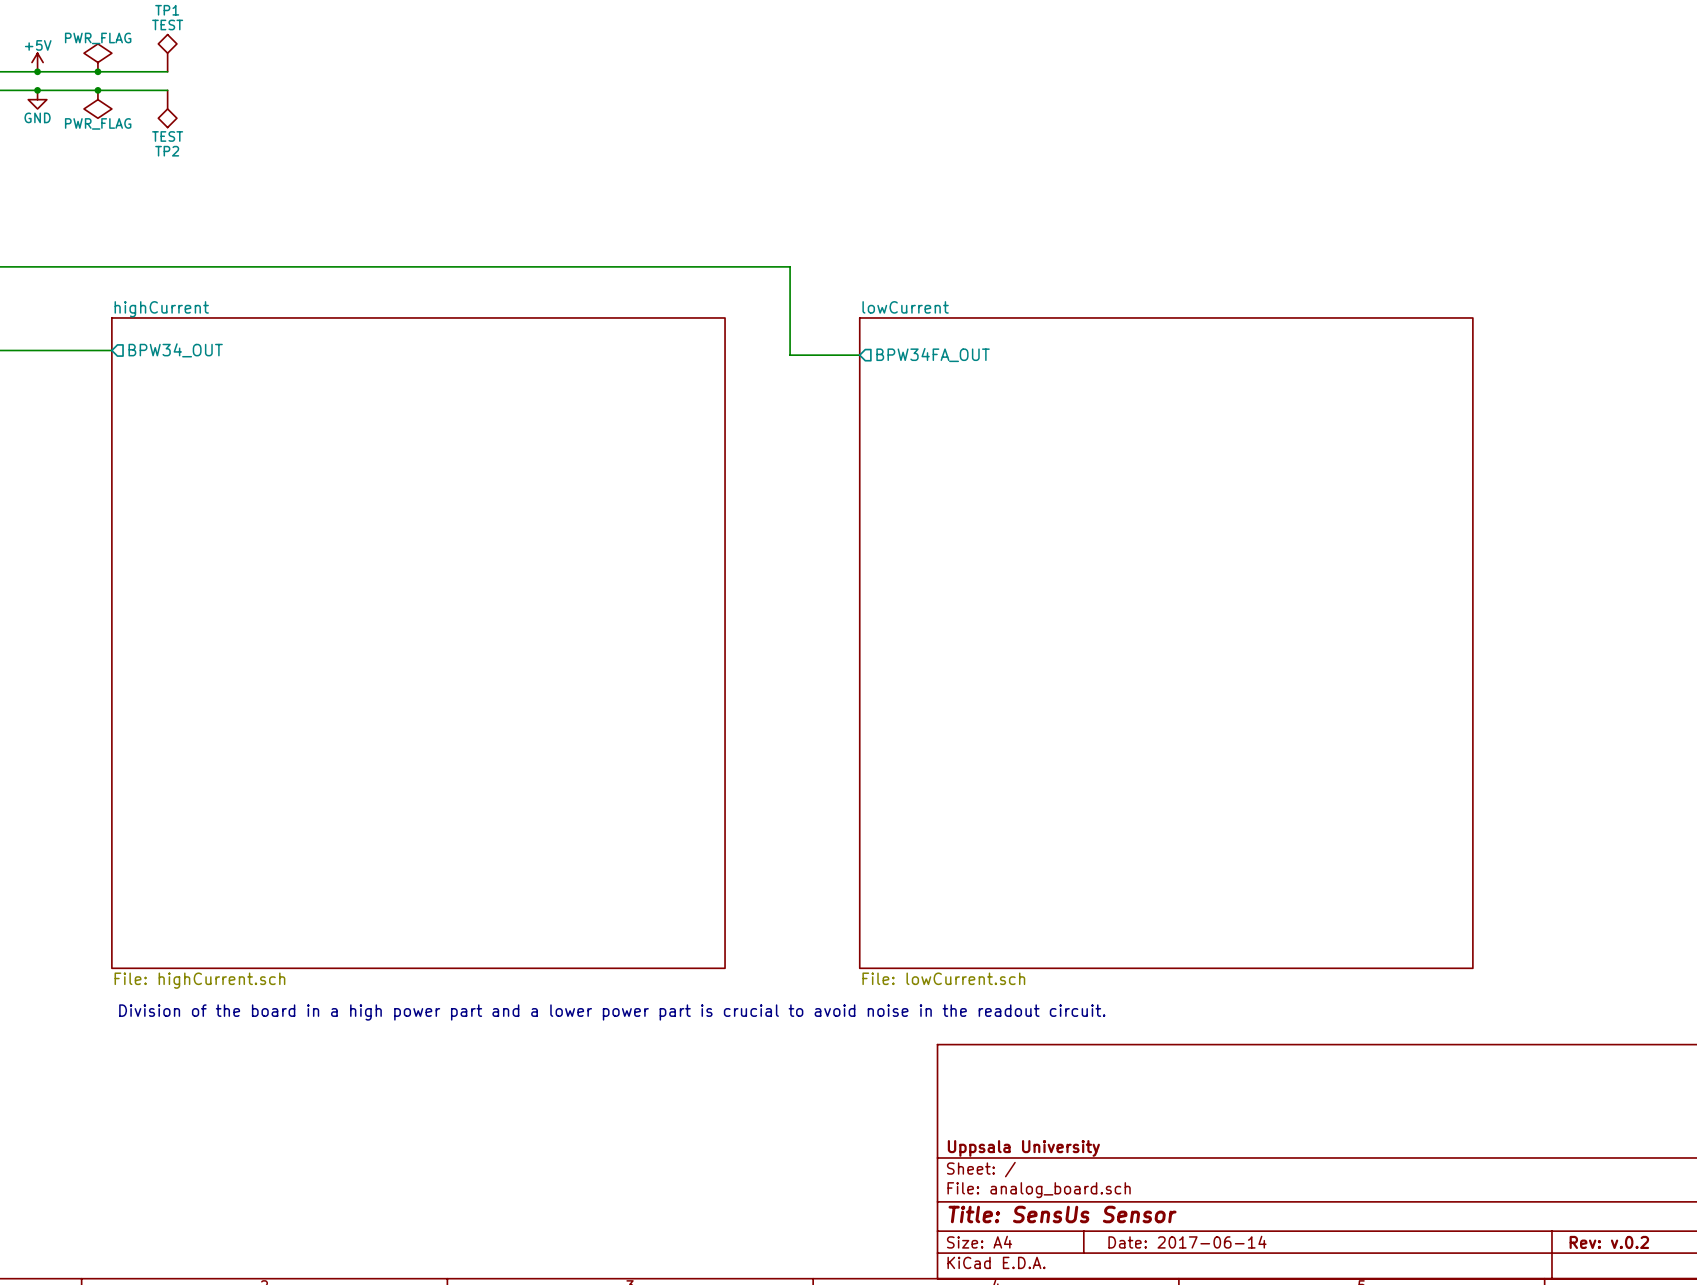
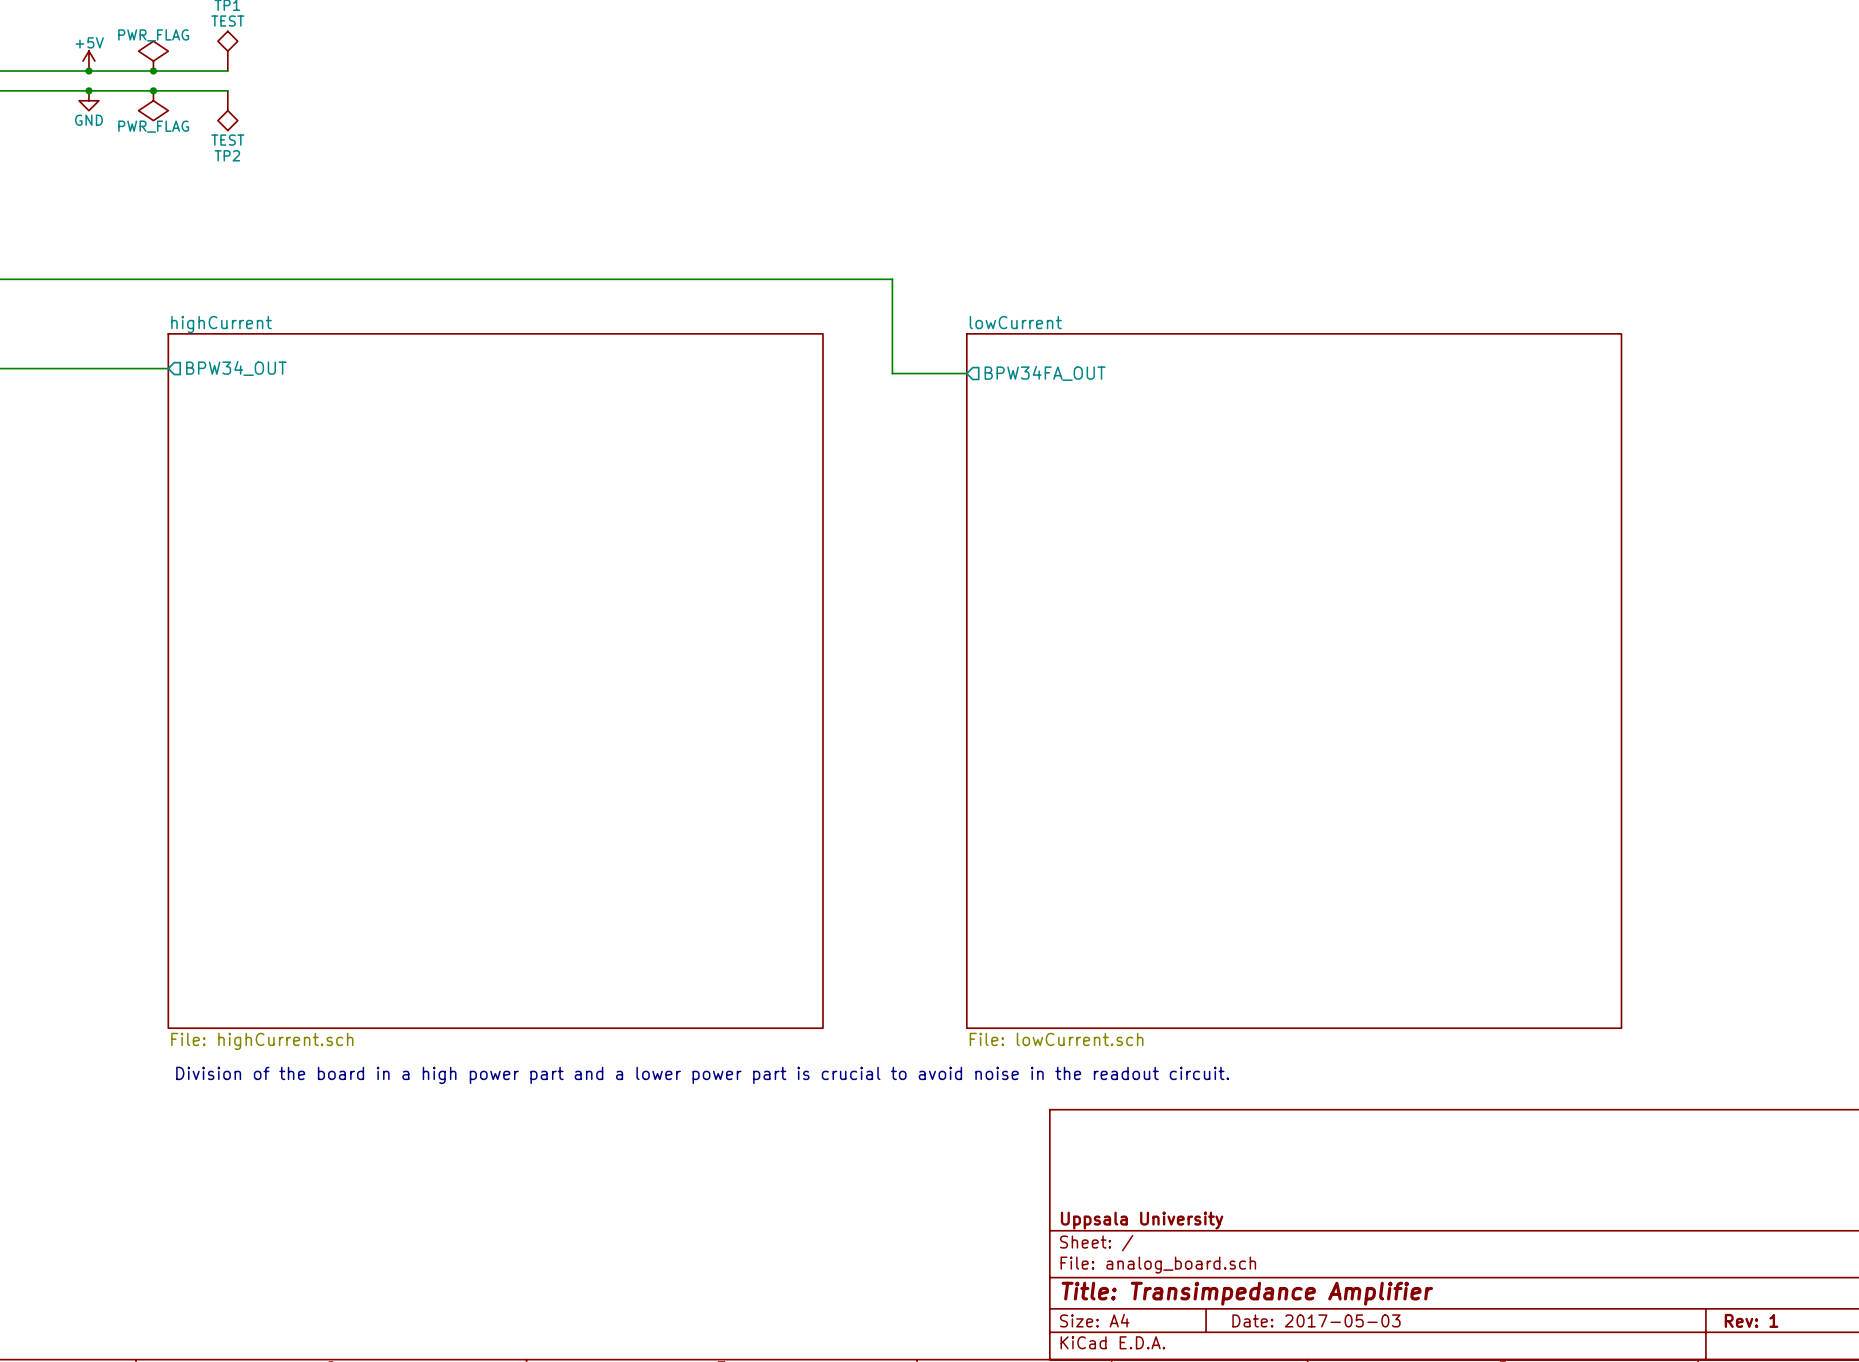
title block: Title: SensUs Sensor (1062, 1214) -> Title: Transimpedance Amplifier (1247, 1293)
title block: Date: 2017-06-14 (1187, 1242) -> Date: 2017-05-03 (1316, 1320)
title block: Rev: v.0.2 (1609, 1242) -> Rev: 1 (1751, 1320)

